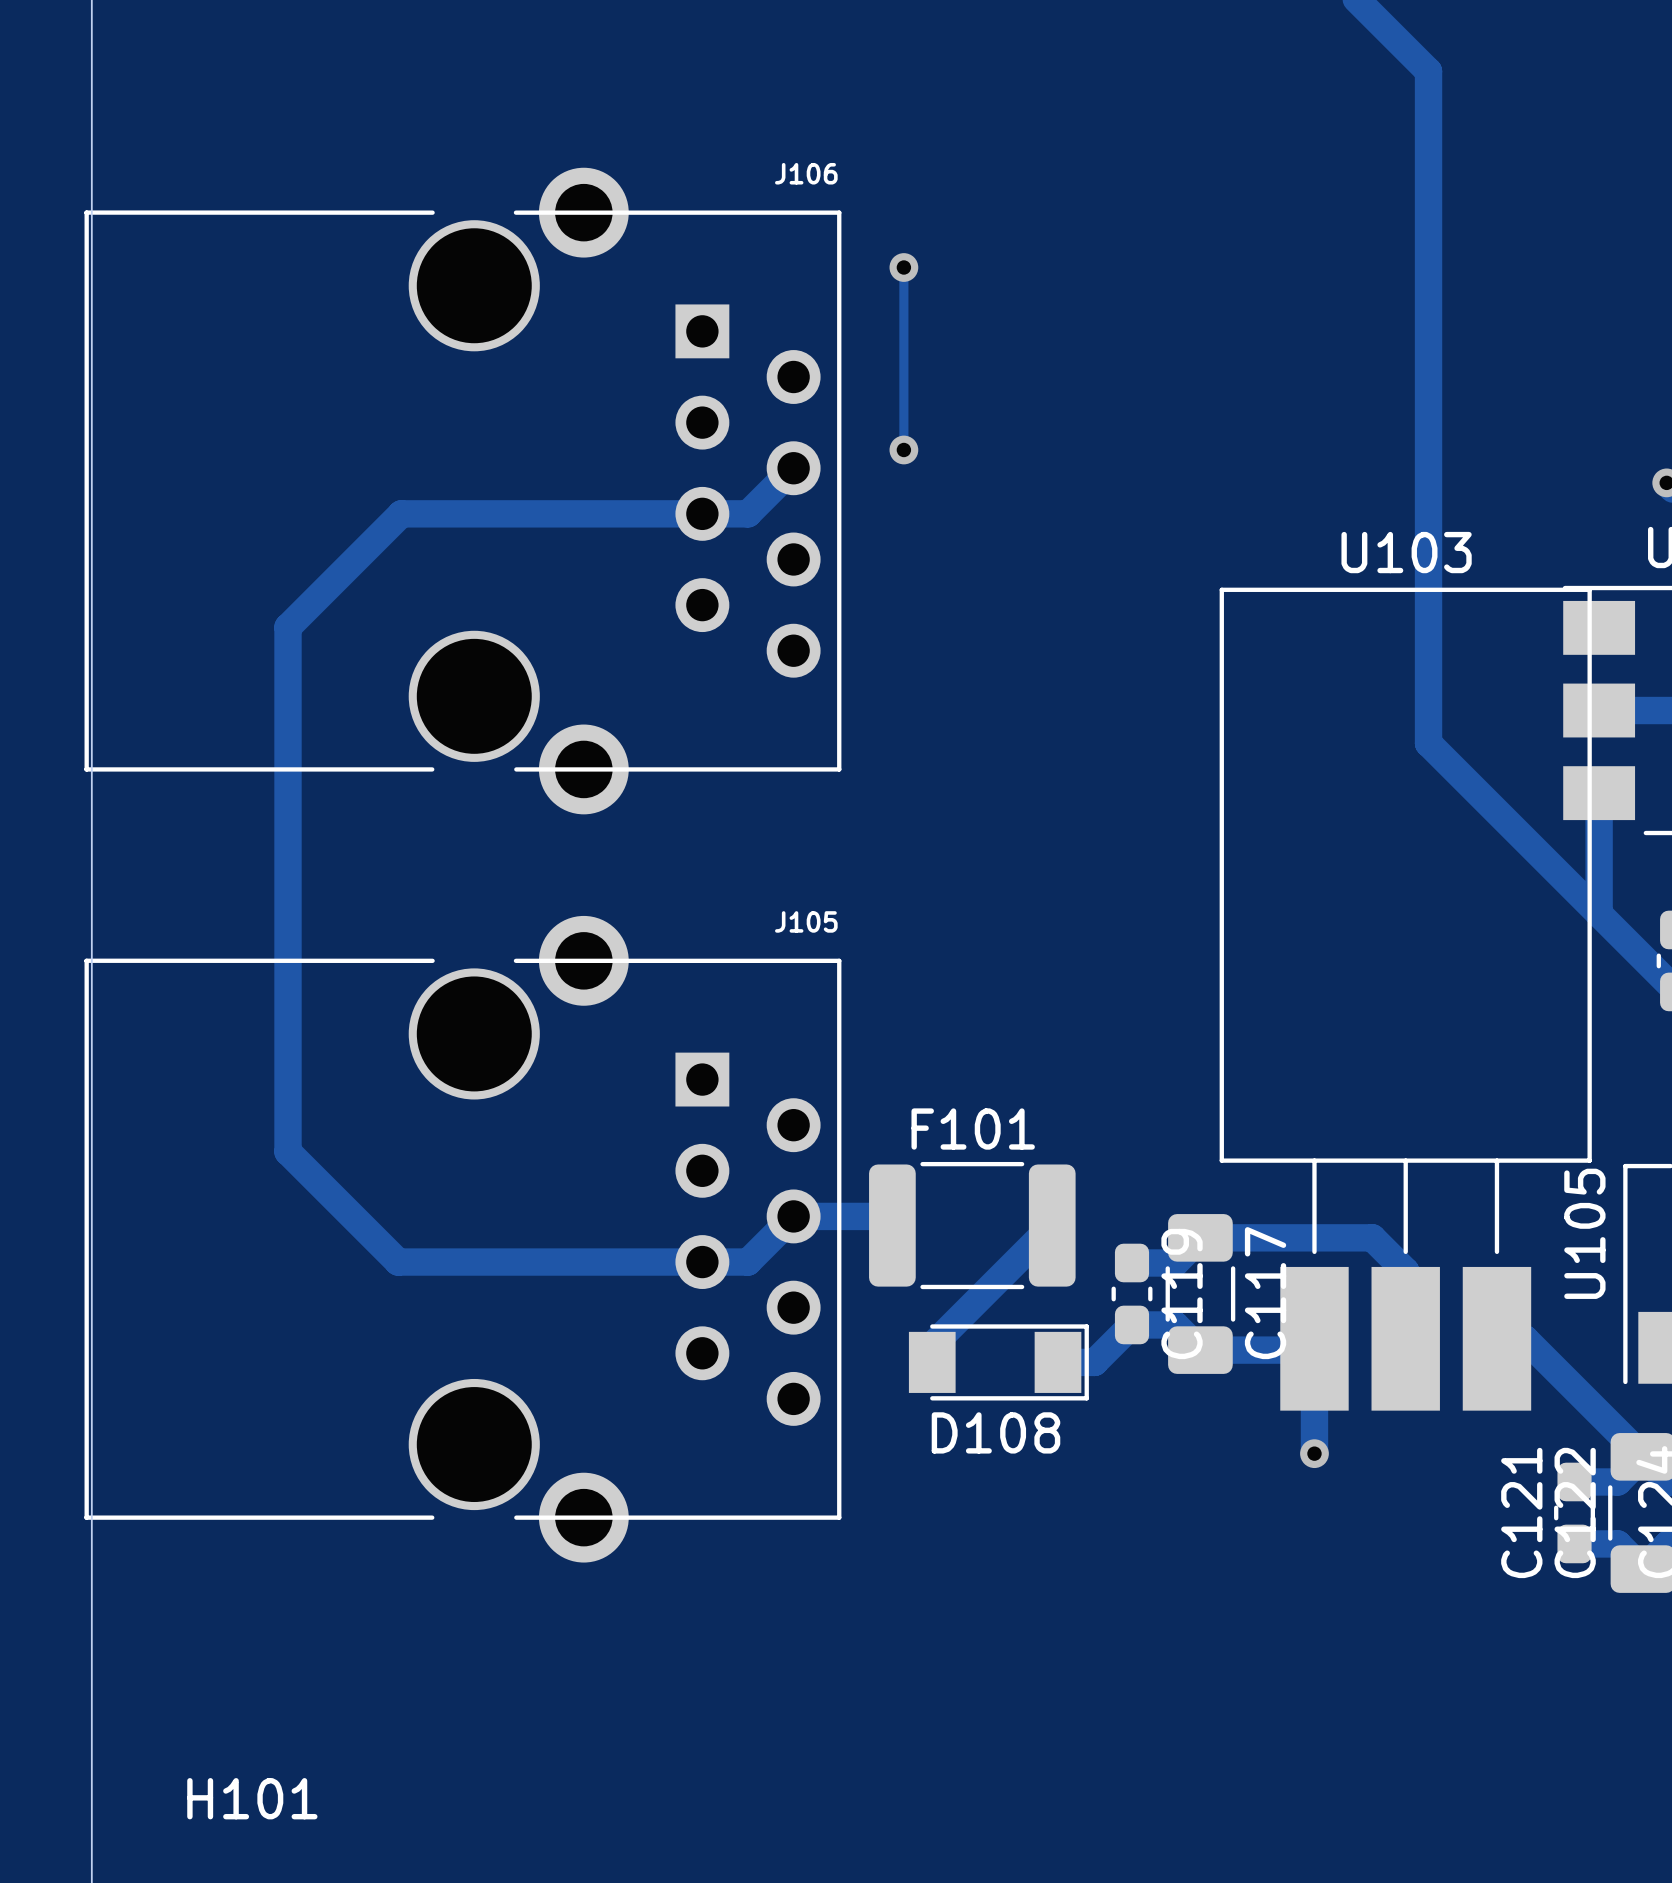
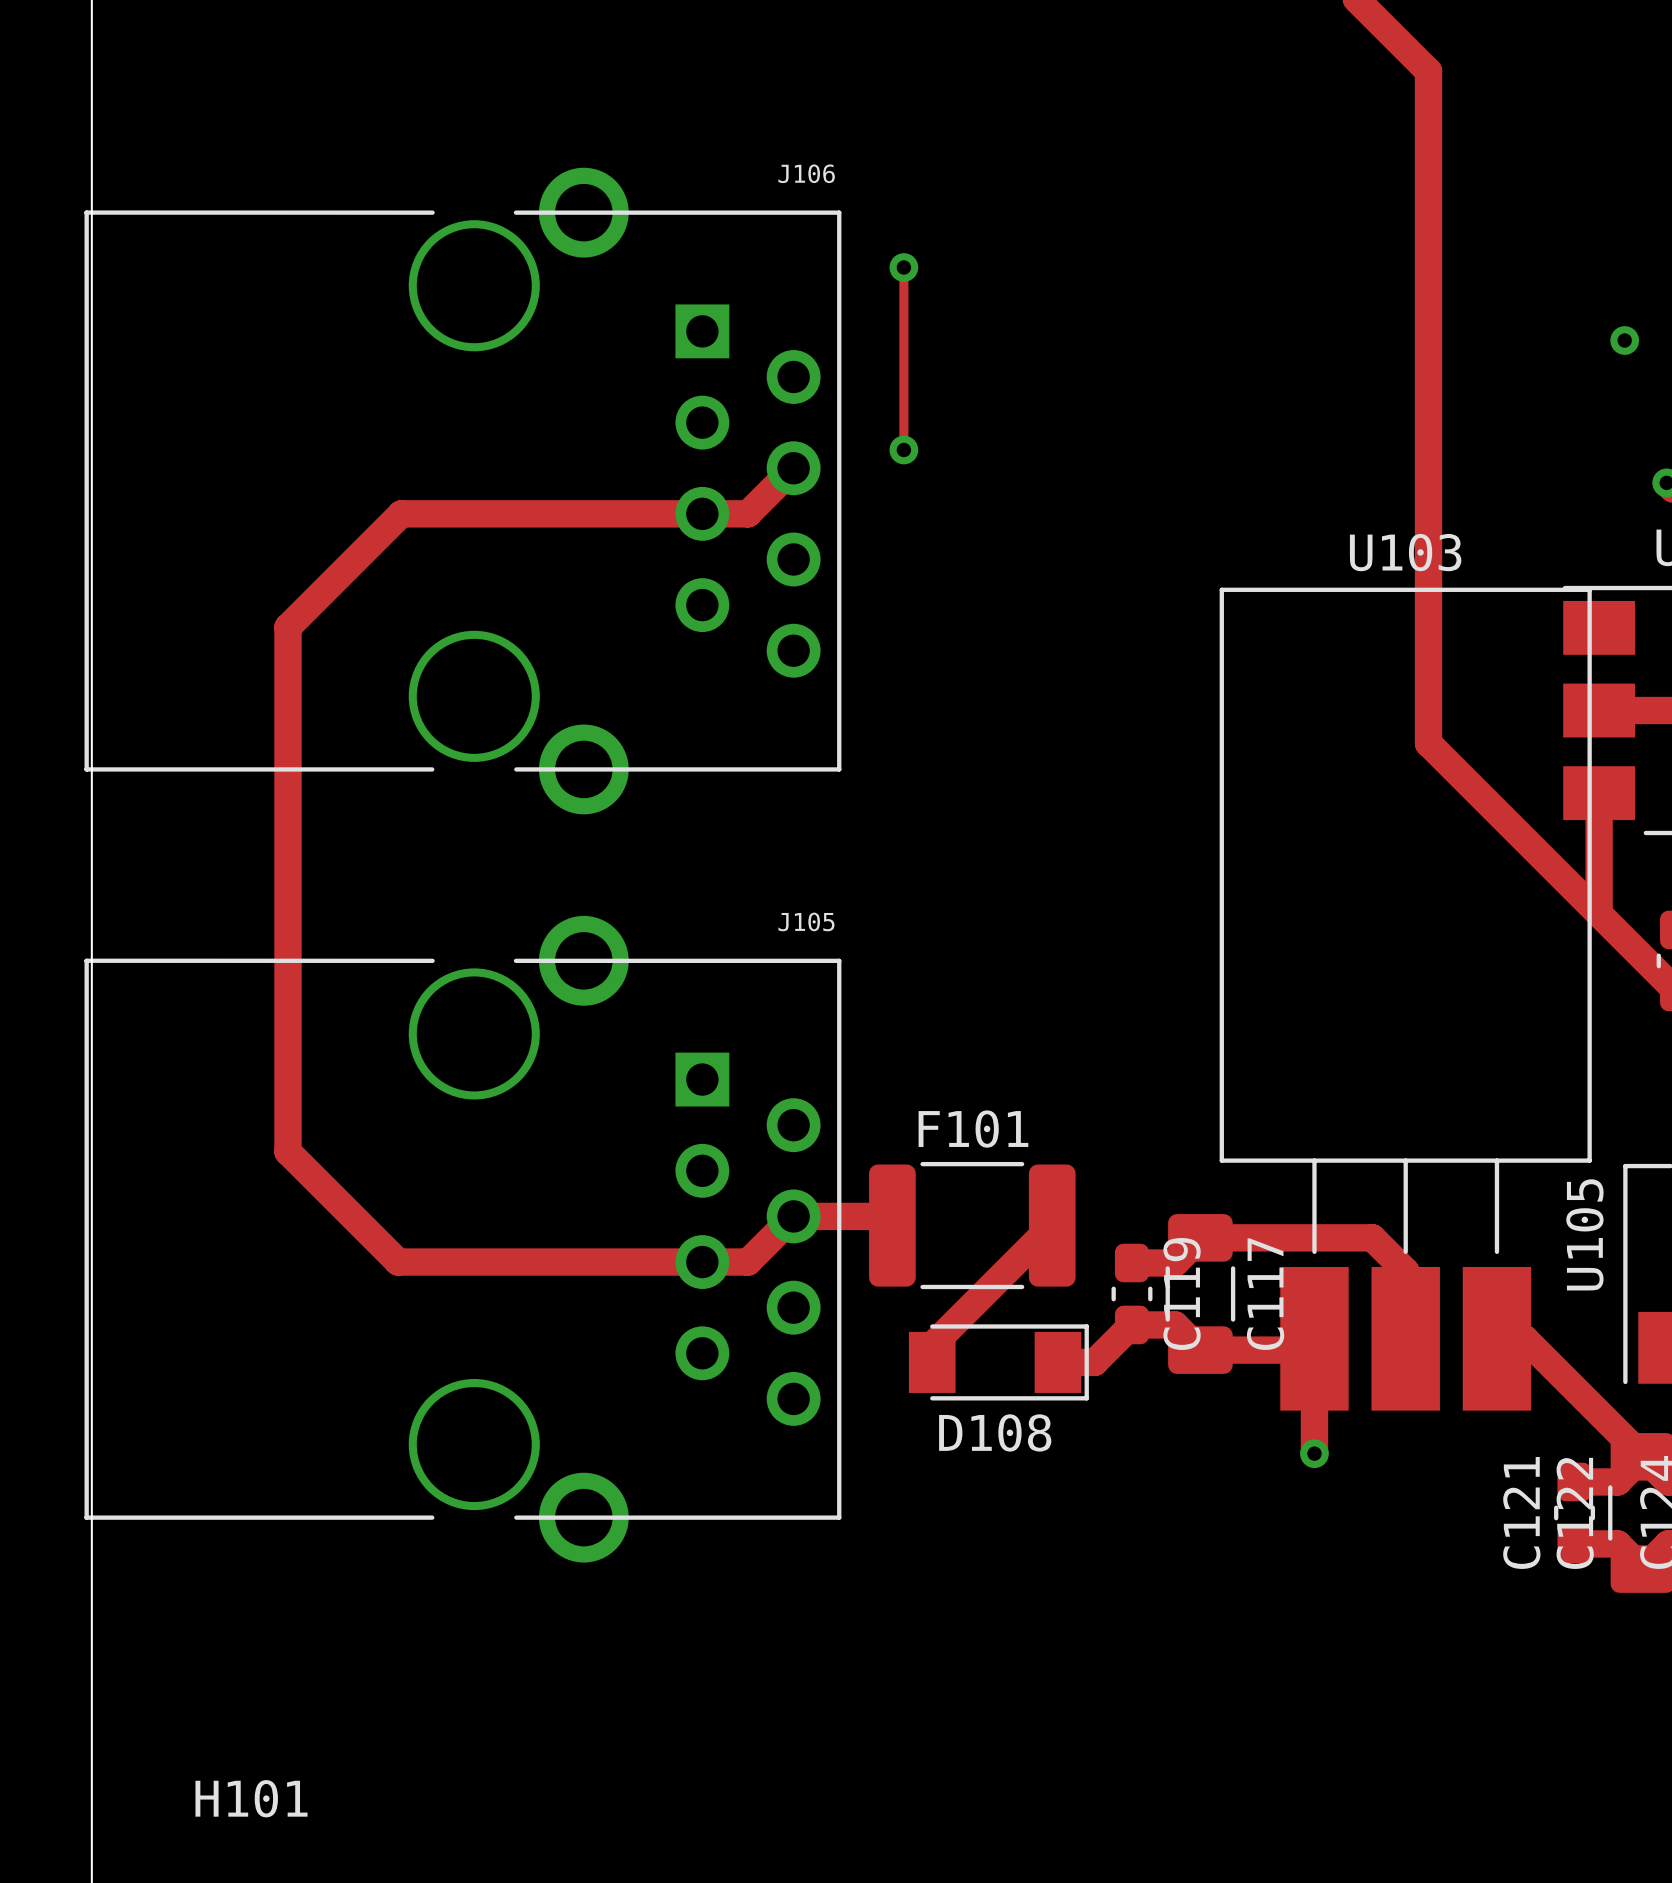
via: none -> (1624, 340)

